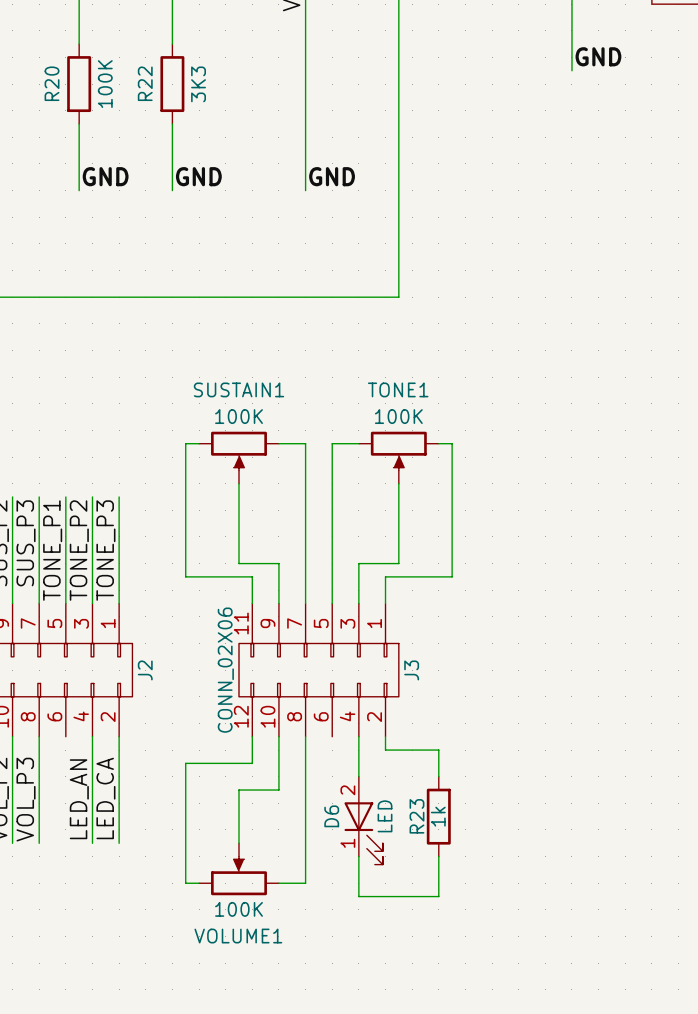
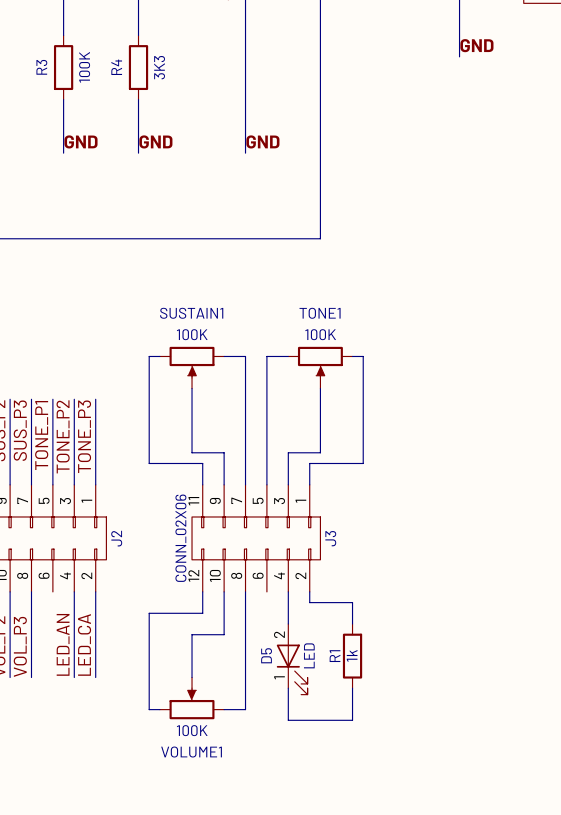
R20 name: R20 (52, 83) -> R3 (41, 67)
R22 name: R22 (145, 83) -> R4 (116, 67)
D6 name: D6 (331, 816) -> D5 (266, 655)
R23 name: R23 (416, 816) -> R1 (335, 656)

